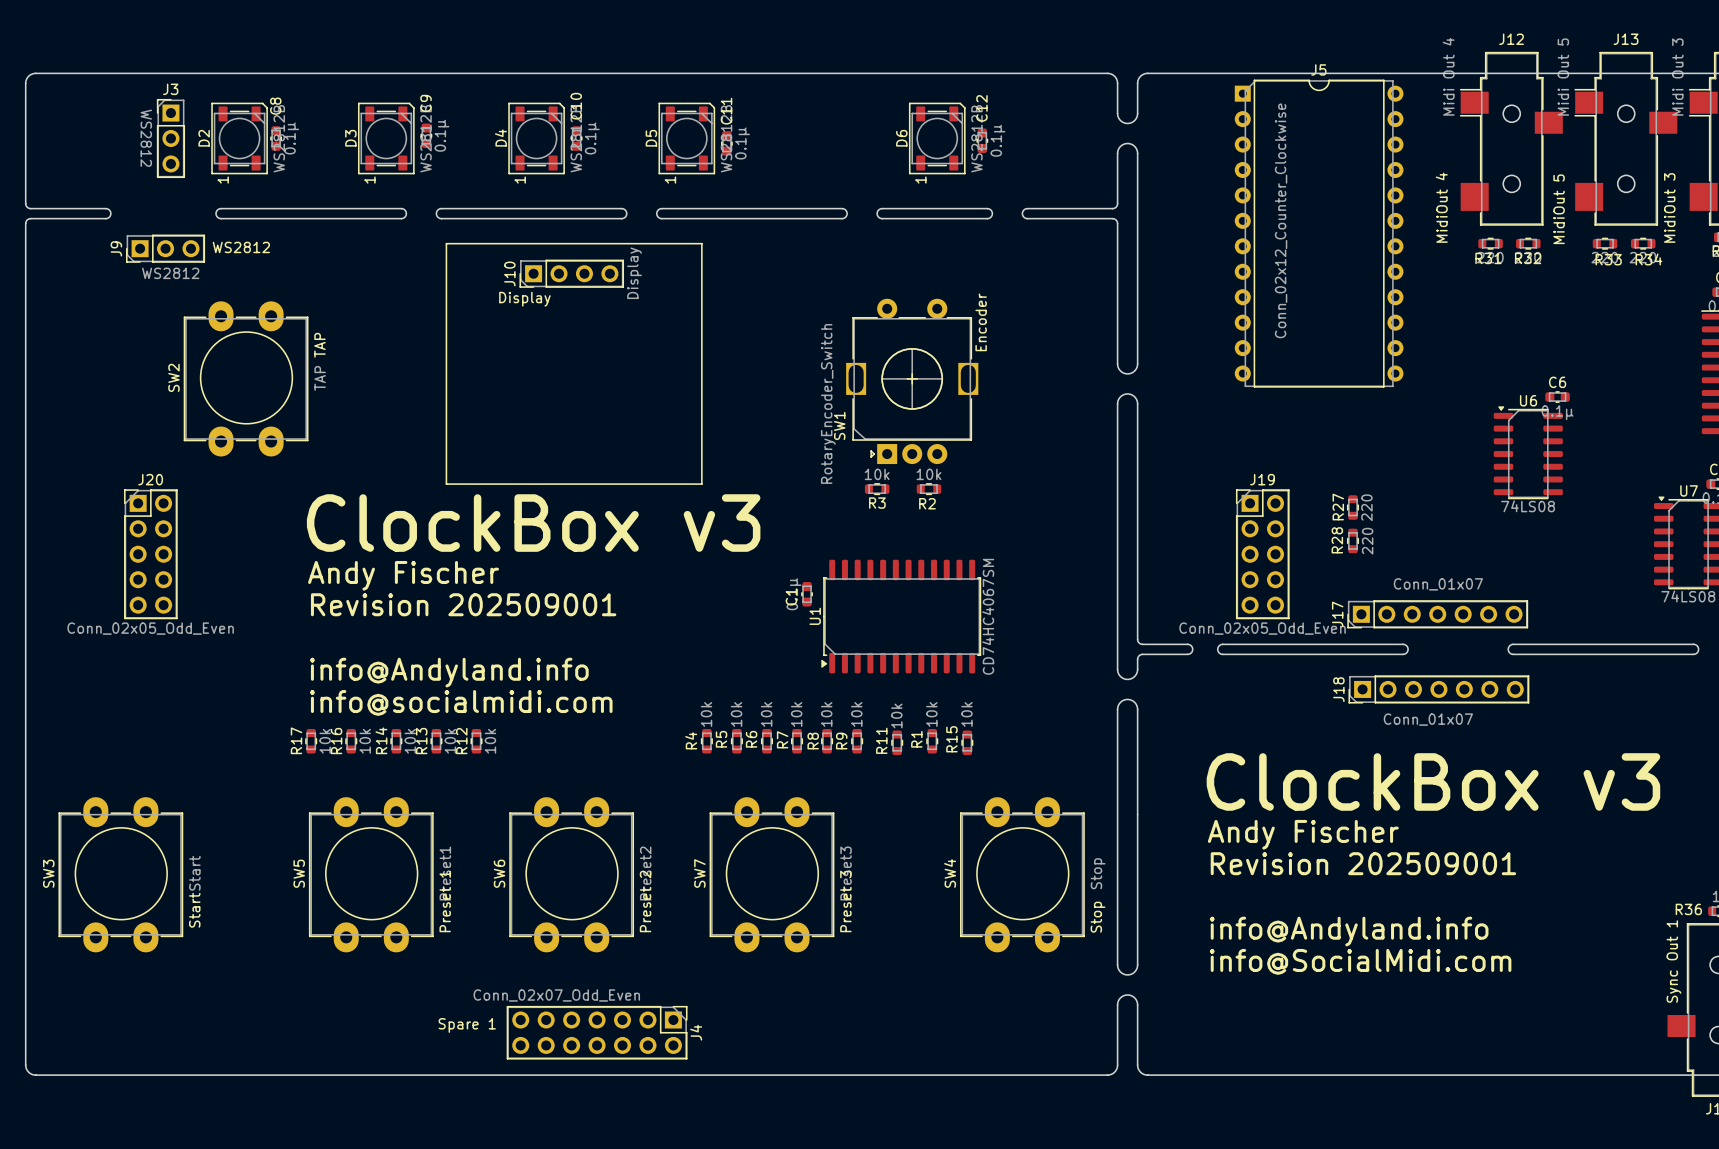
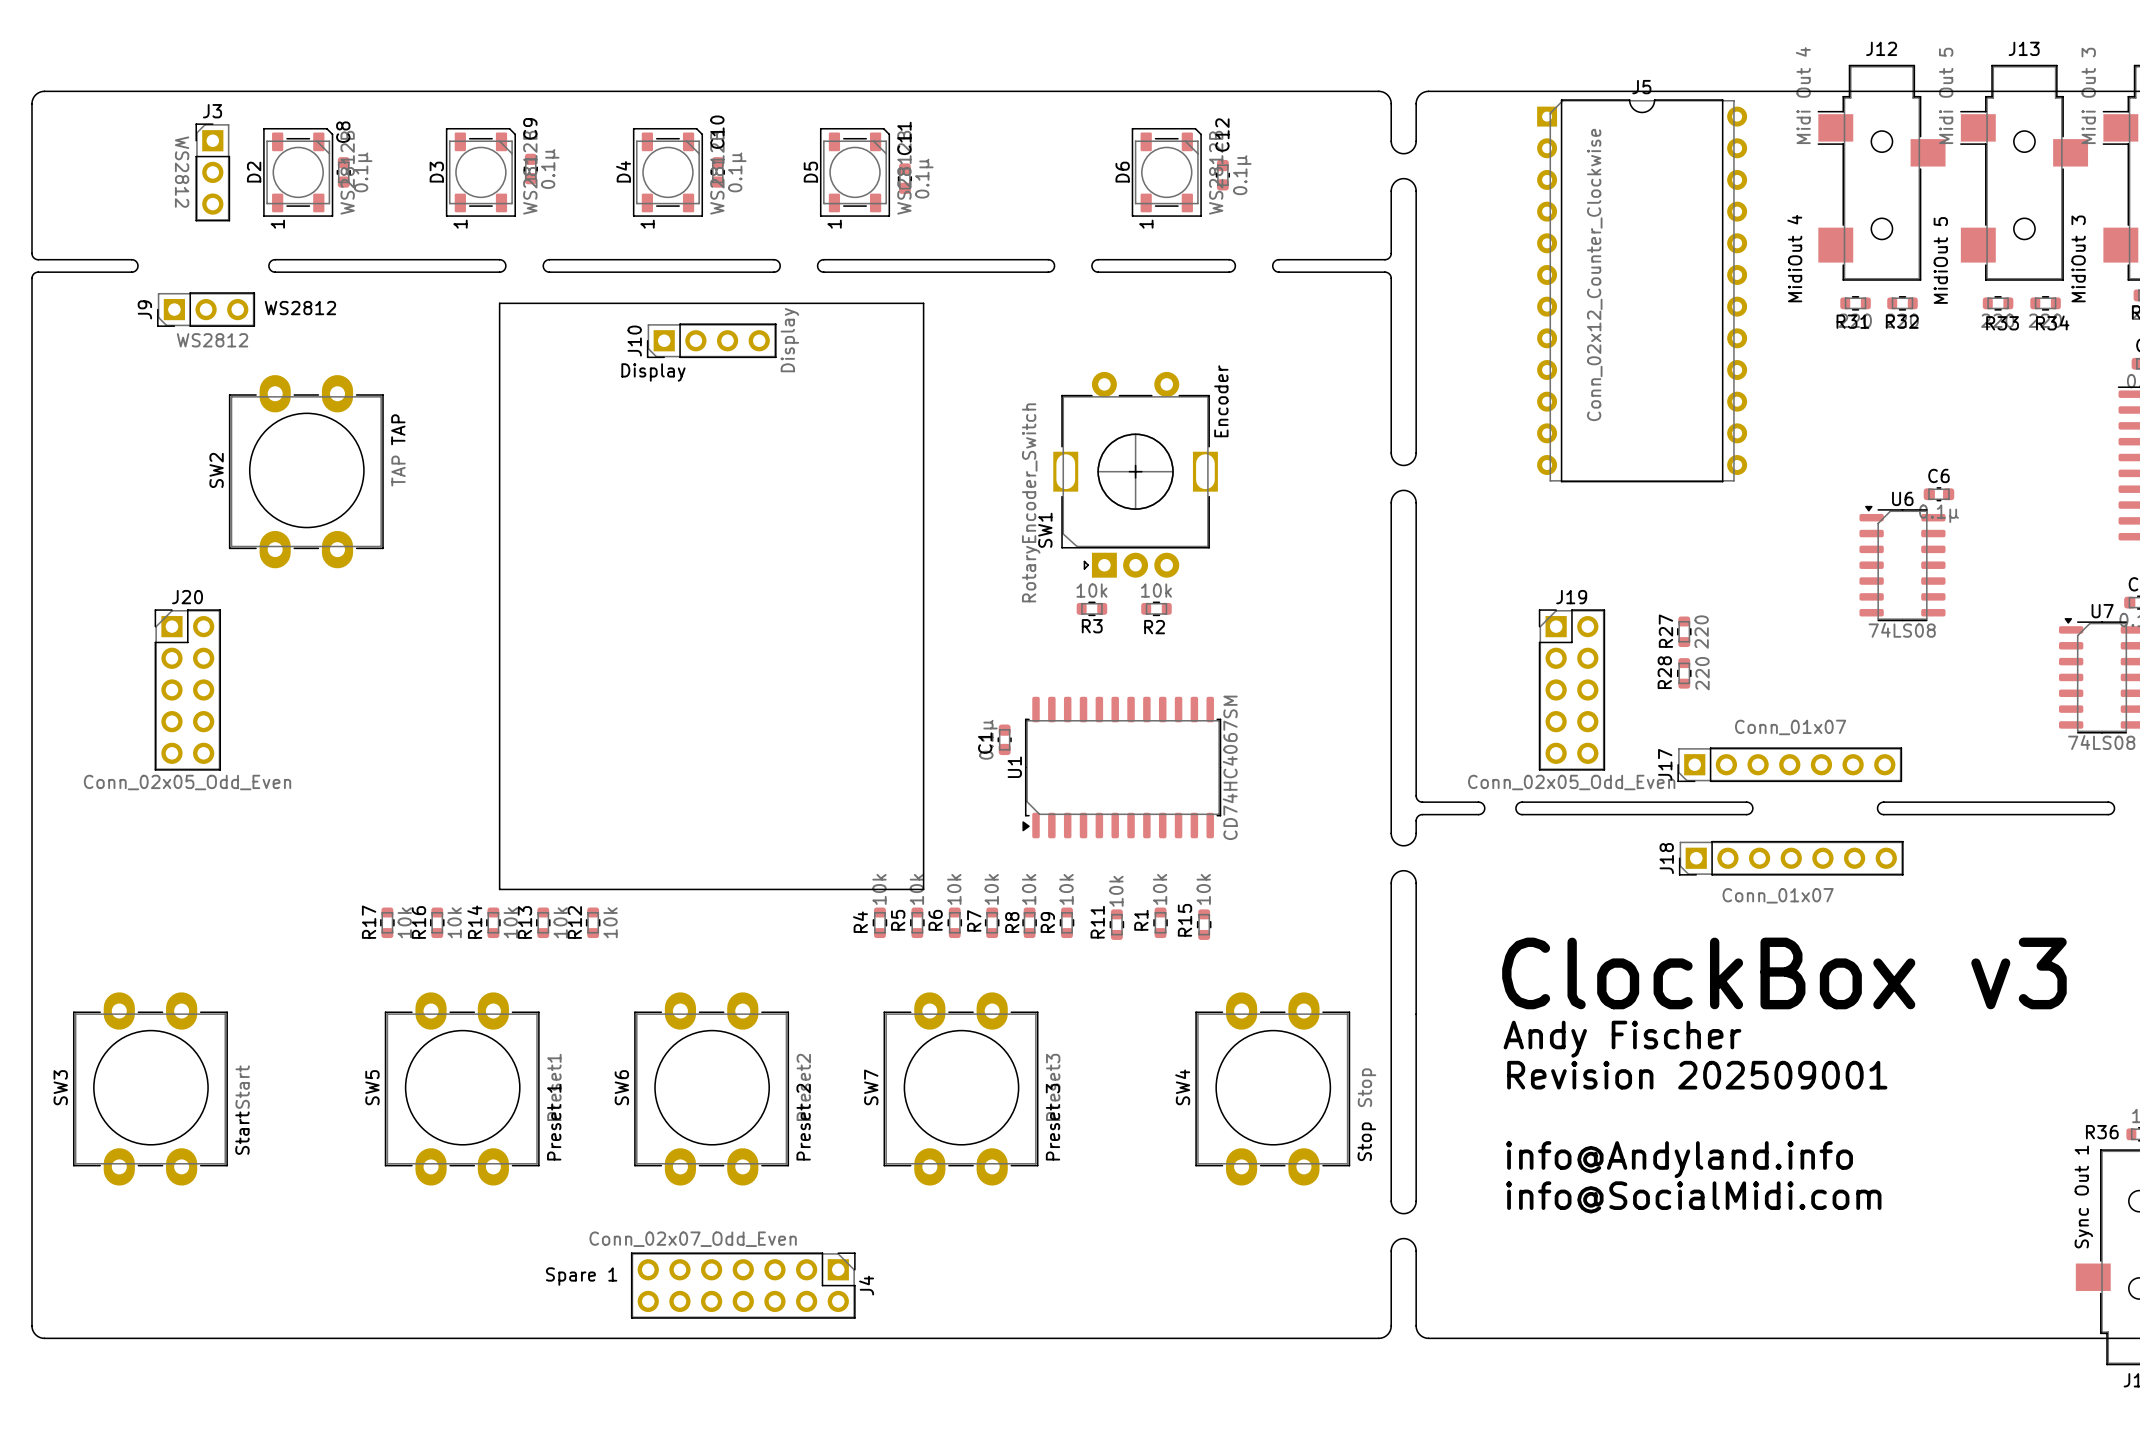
line: (446, 243) (446, 484) (701, 484) (701, 243) -> (555, 303) (499, 303) (499, 889) (923, 889) (923, 303) (873, 303)
text: ClockBox v3 (533, 523) -> none
text: Andy Fischer (403, 575) -> none
text: Revision 202509001 (463, 604) -> none
text: info@Andyland.info (449, 672) -> none
text: info@socialmidi.com (461, 702) -> none

